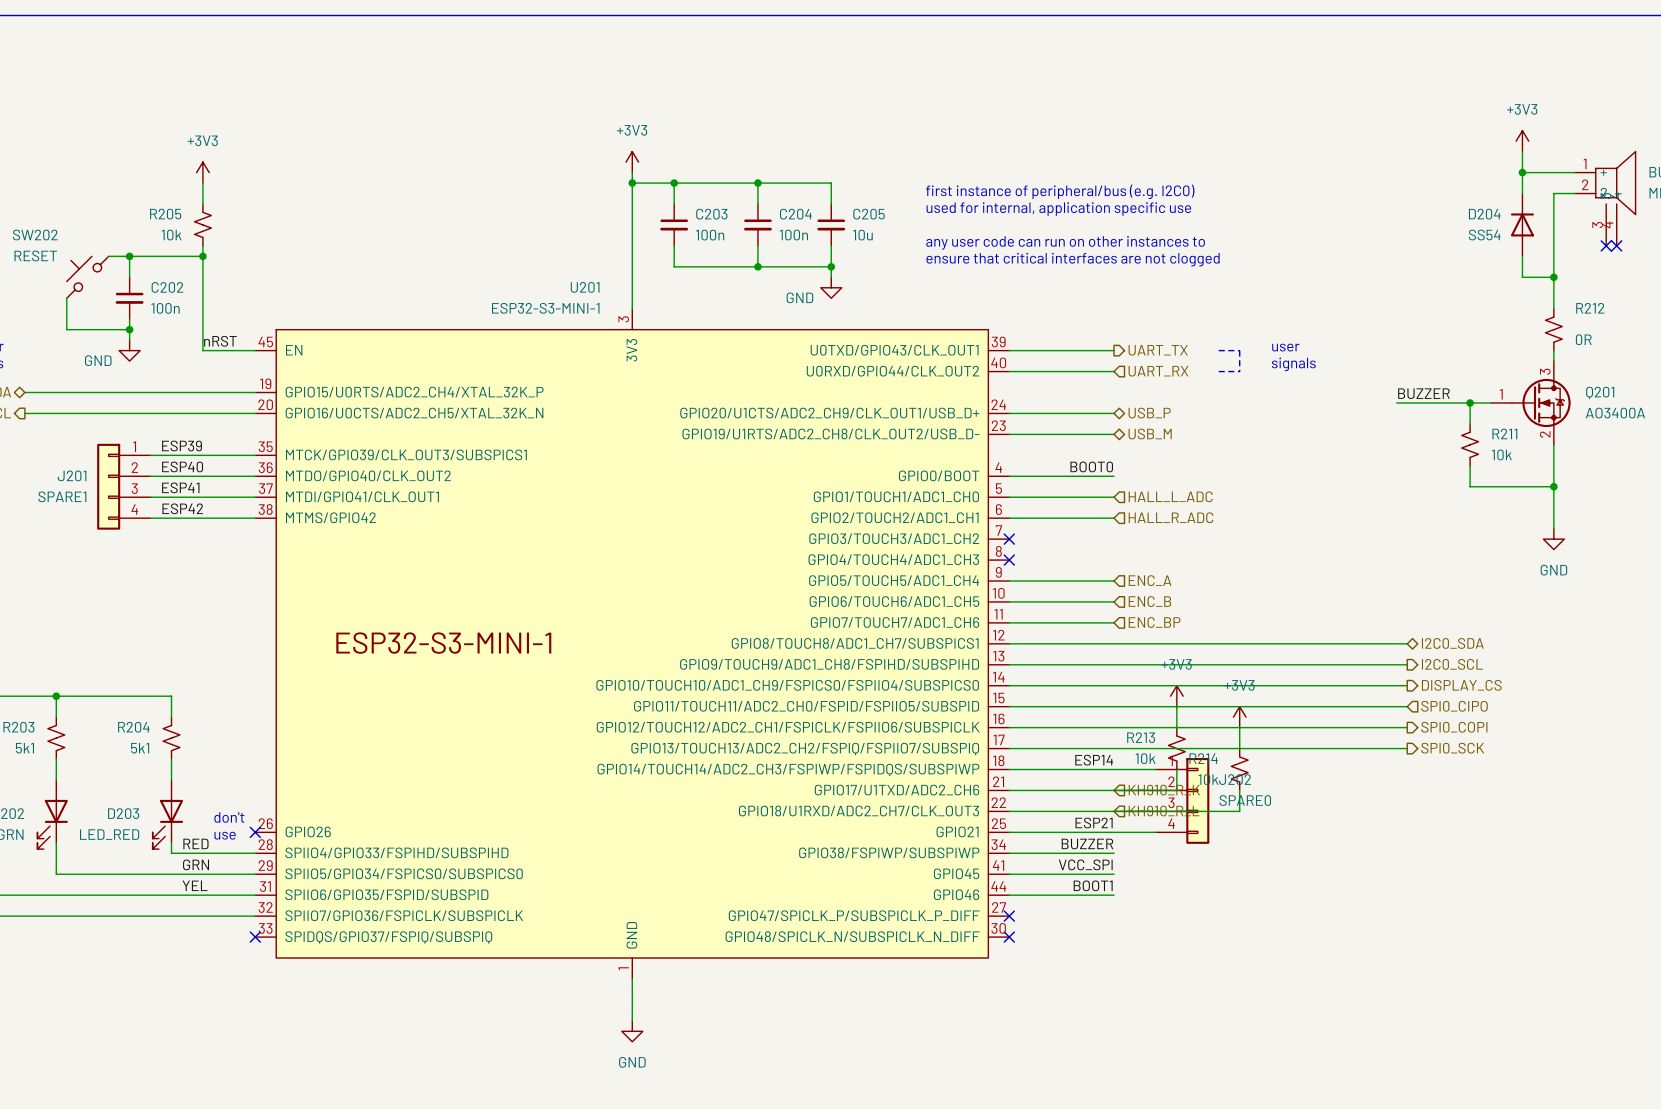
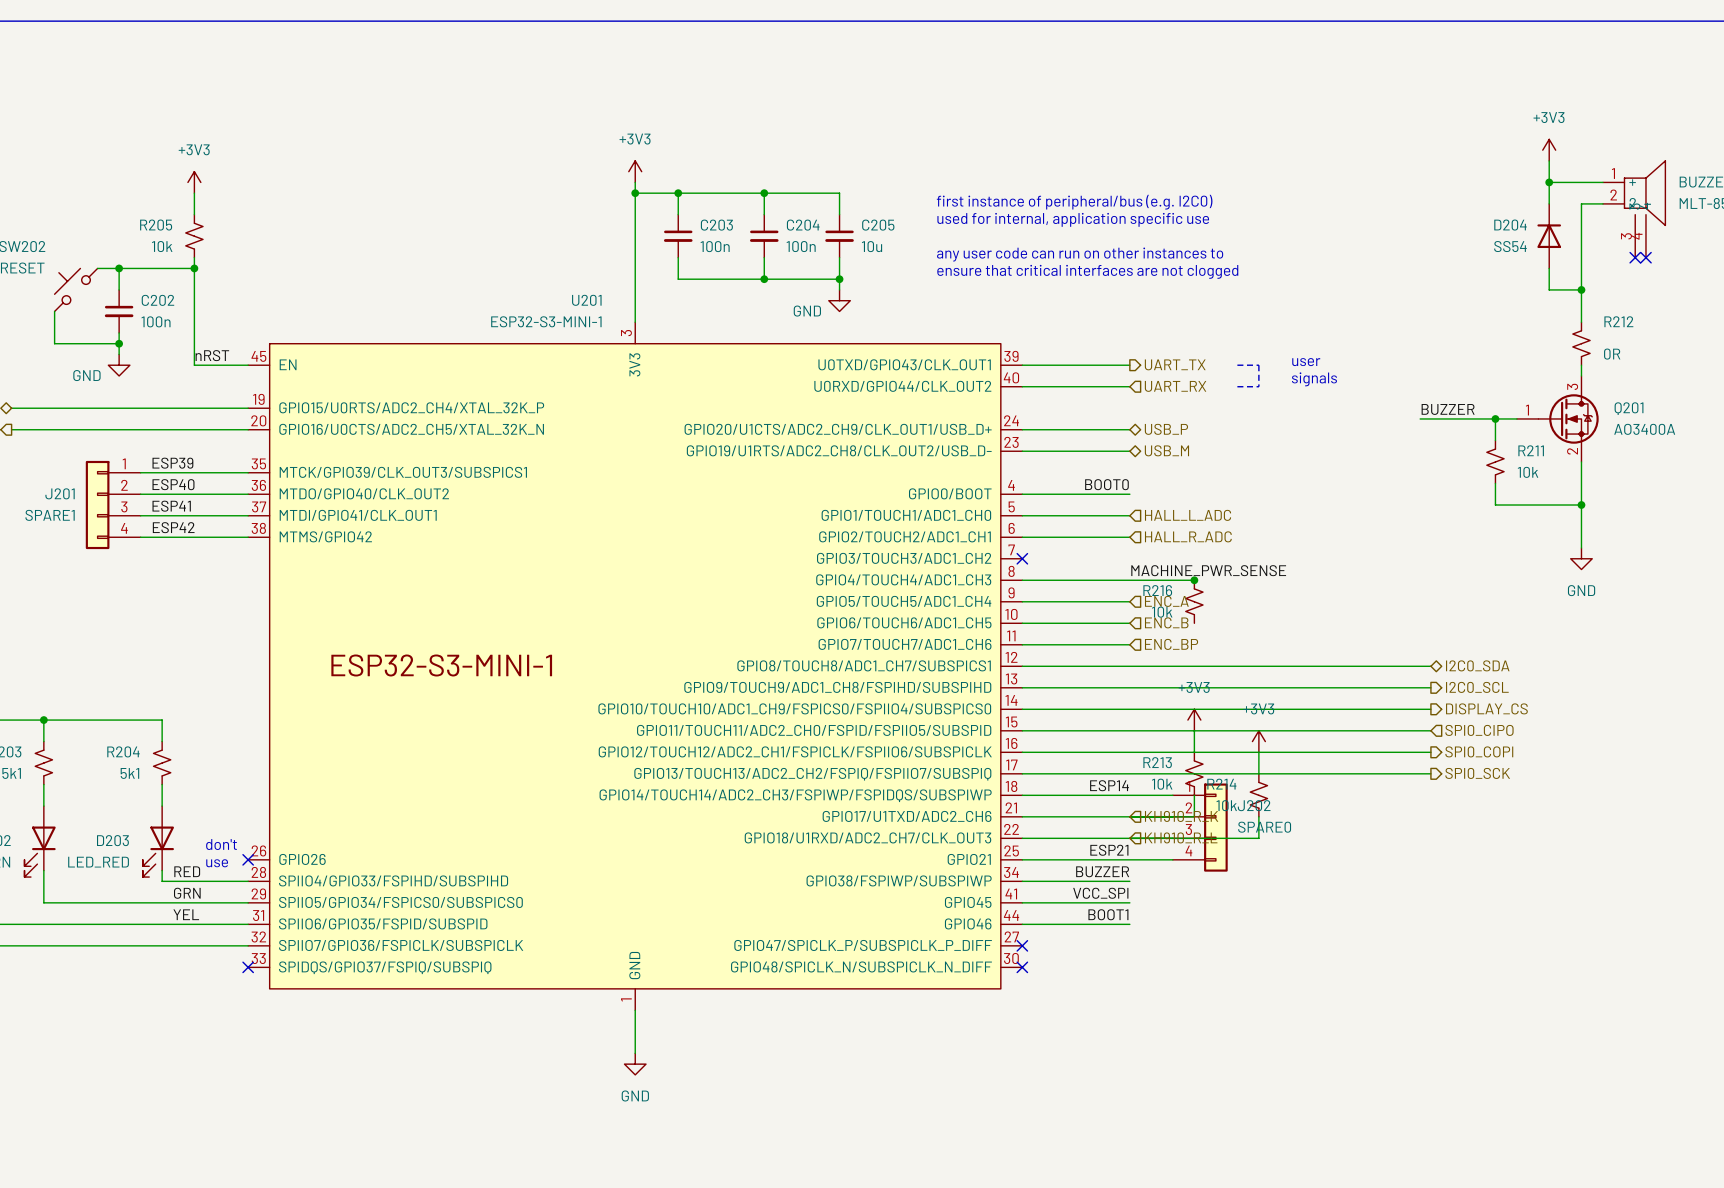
label: none -> MACHINE_PWR_SENSE (1208, 570)
wire: none -> (1022, 580) (1194, 580)
no-connect mark: (1009, 560) -> none
junction: none -> (1194, 580)
R216: none -> 10k (1194, 601)

